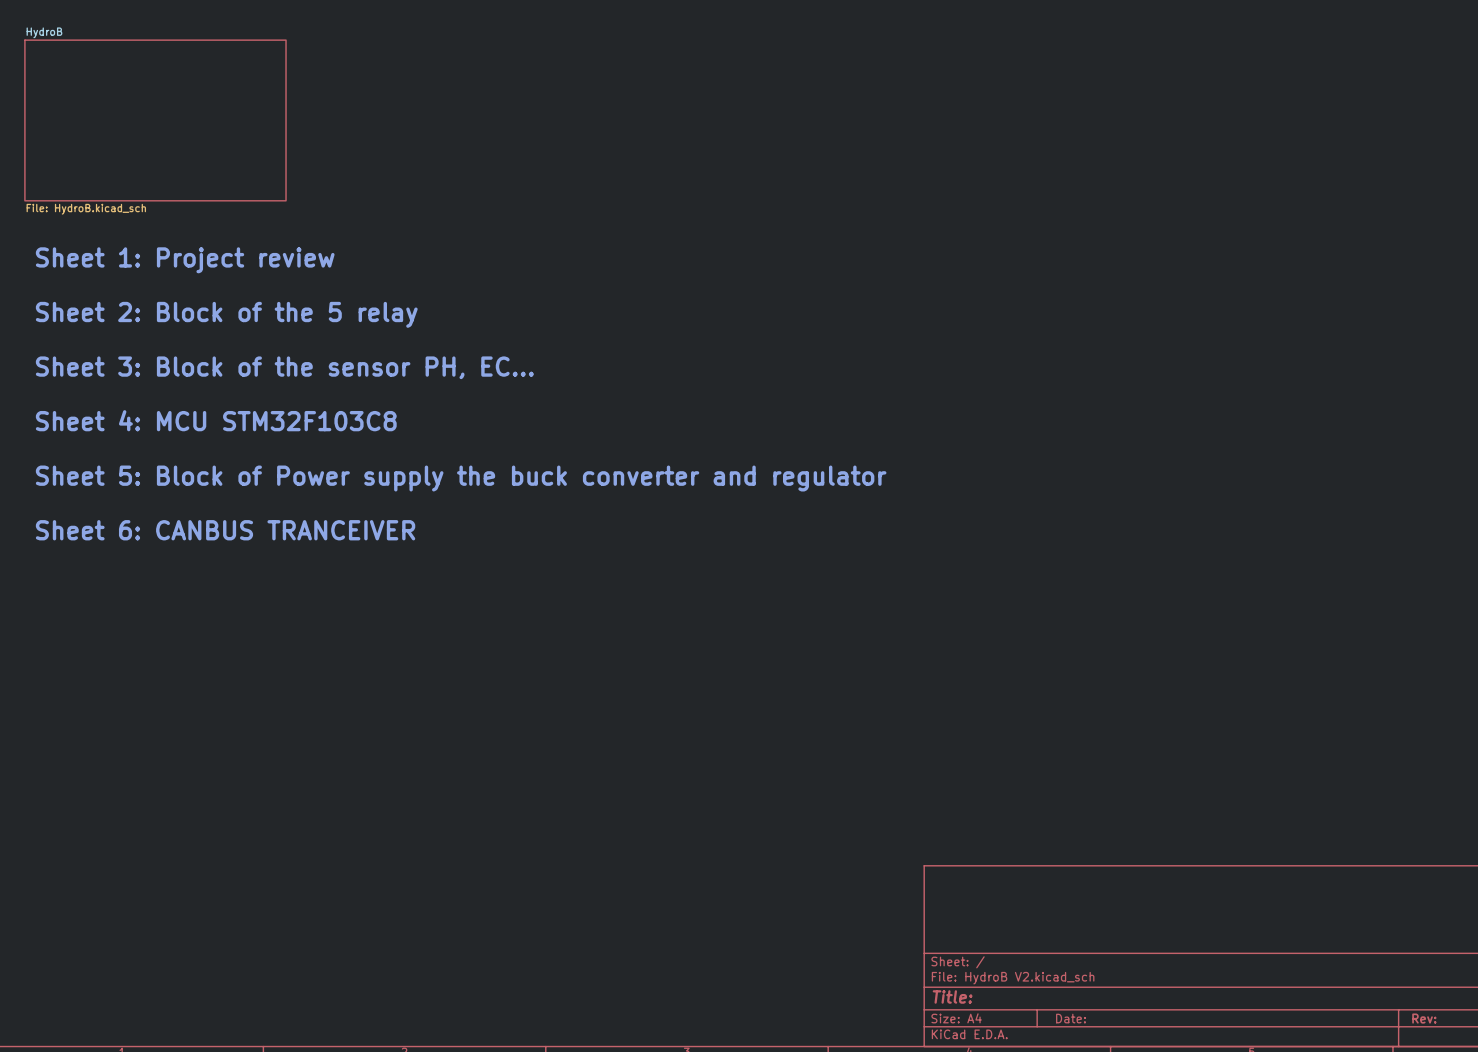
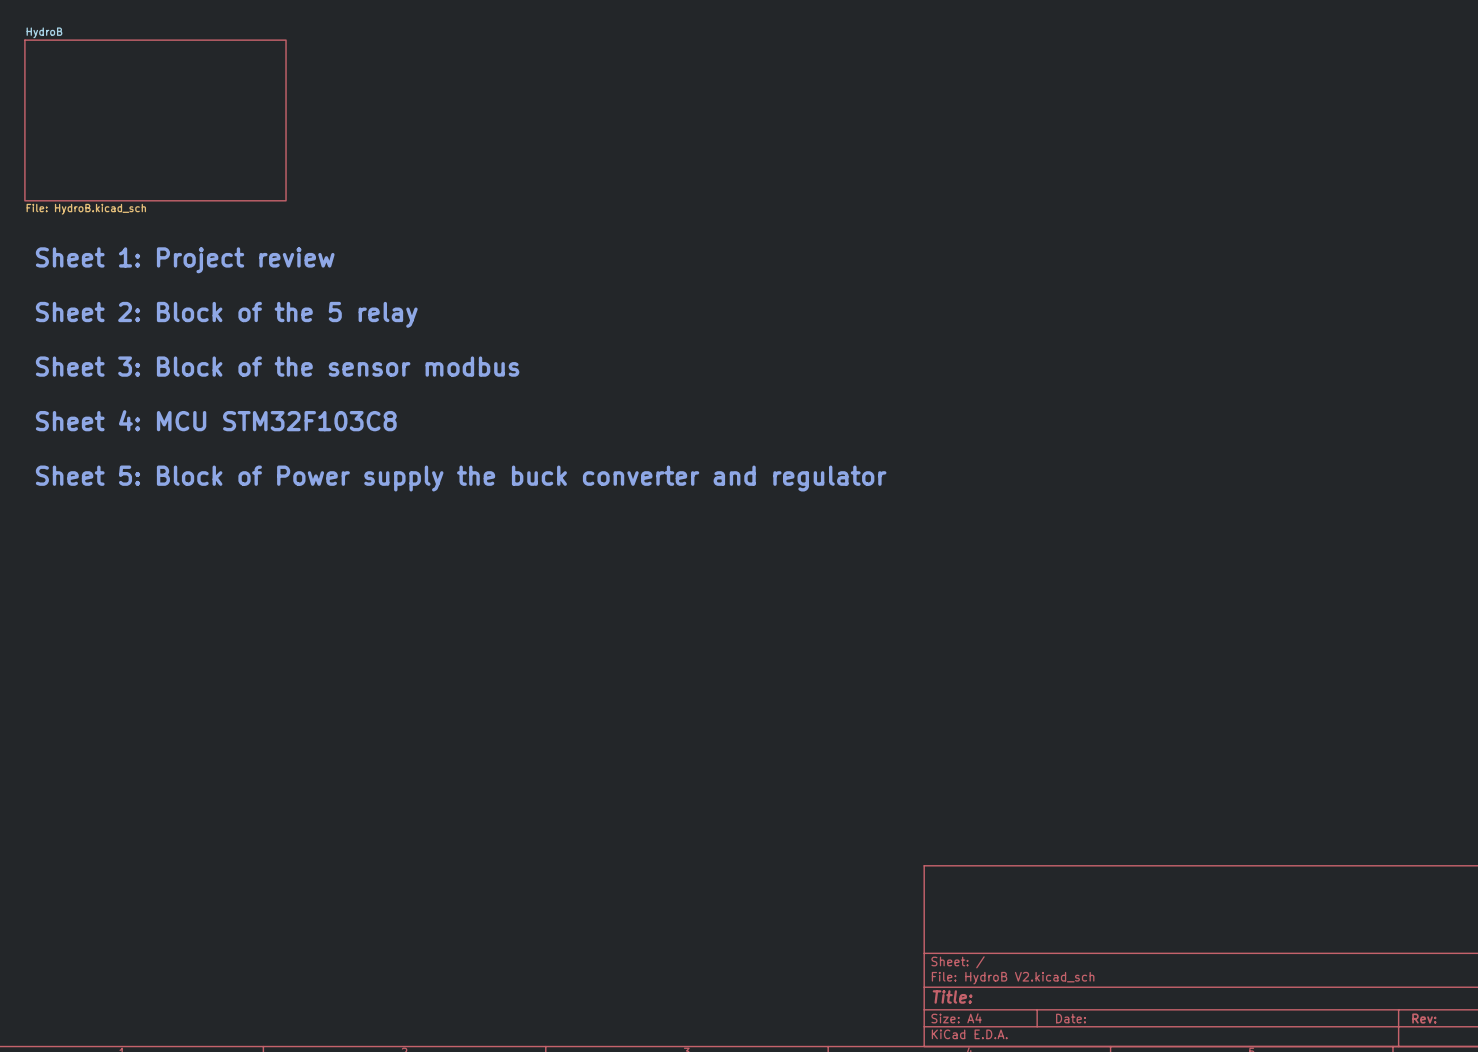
text: Sheet 3: Block of the sensor PH, EC... (284, 367) -> Sheet 3: Block of the sensor modbus (277, 366)
text: Sheet 6: CANBUS TRANCEIVER (225, 530) -> none

